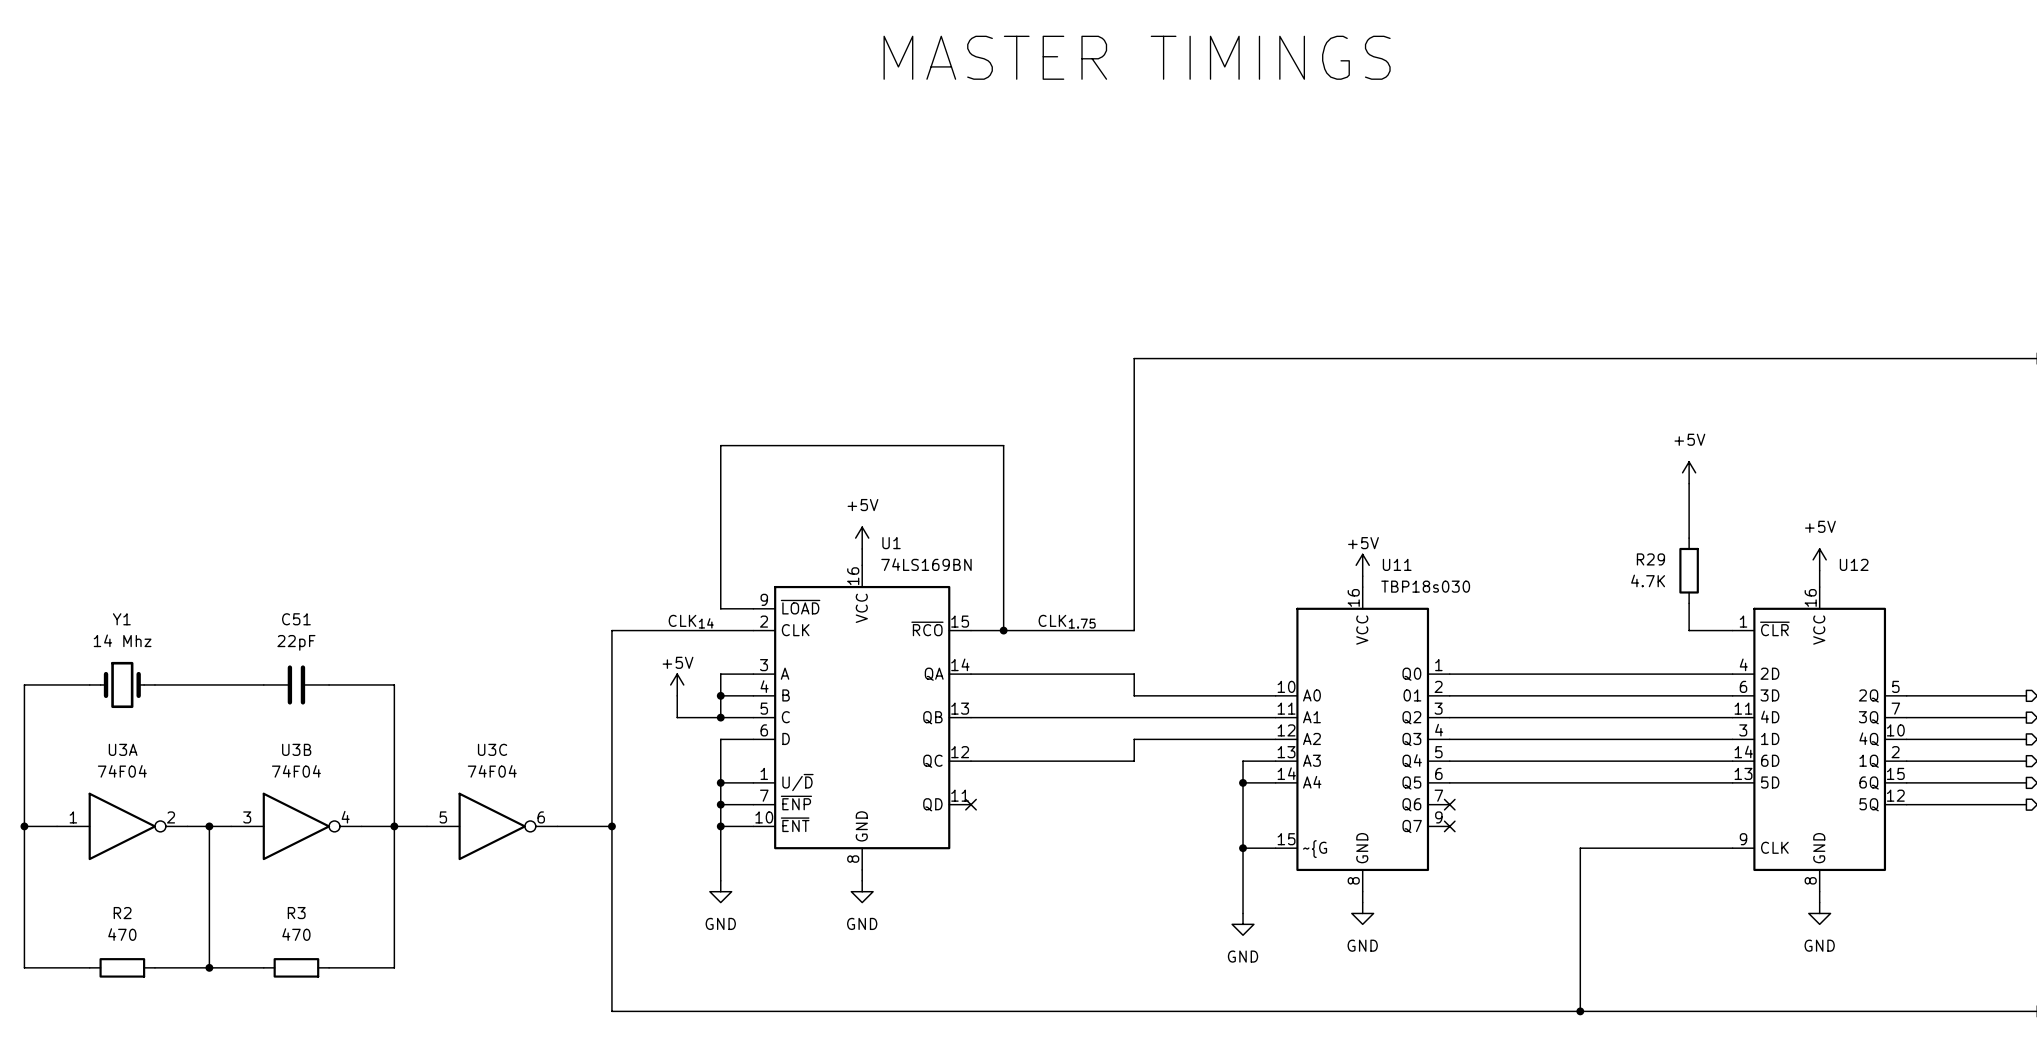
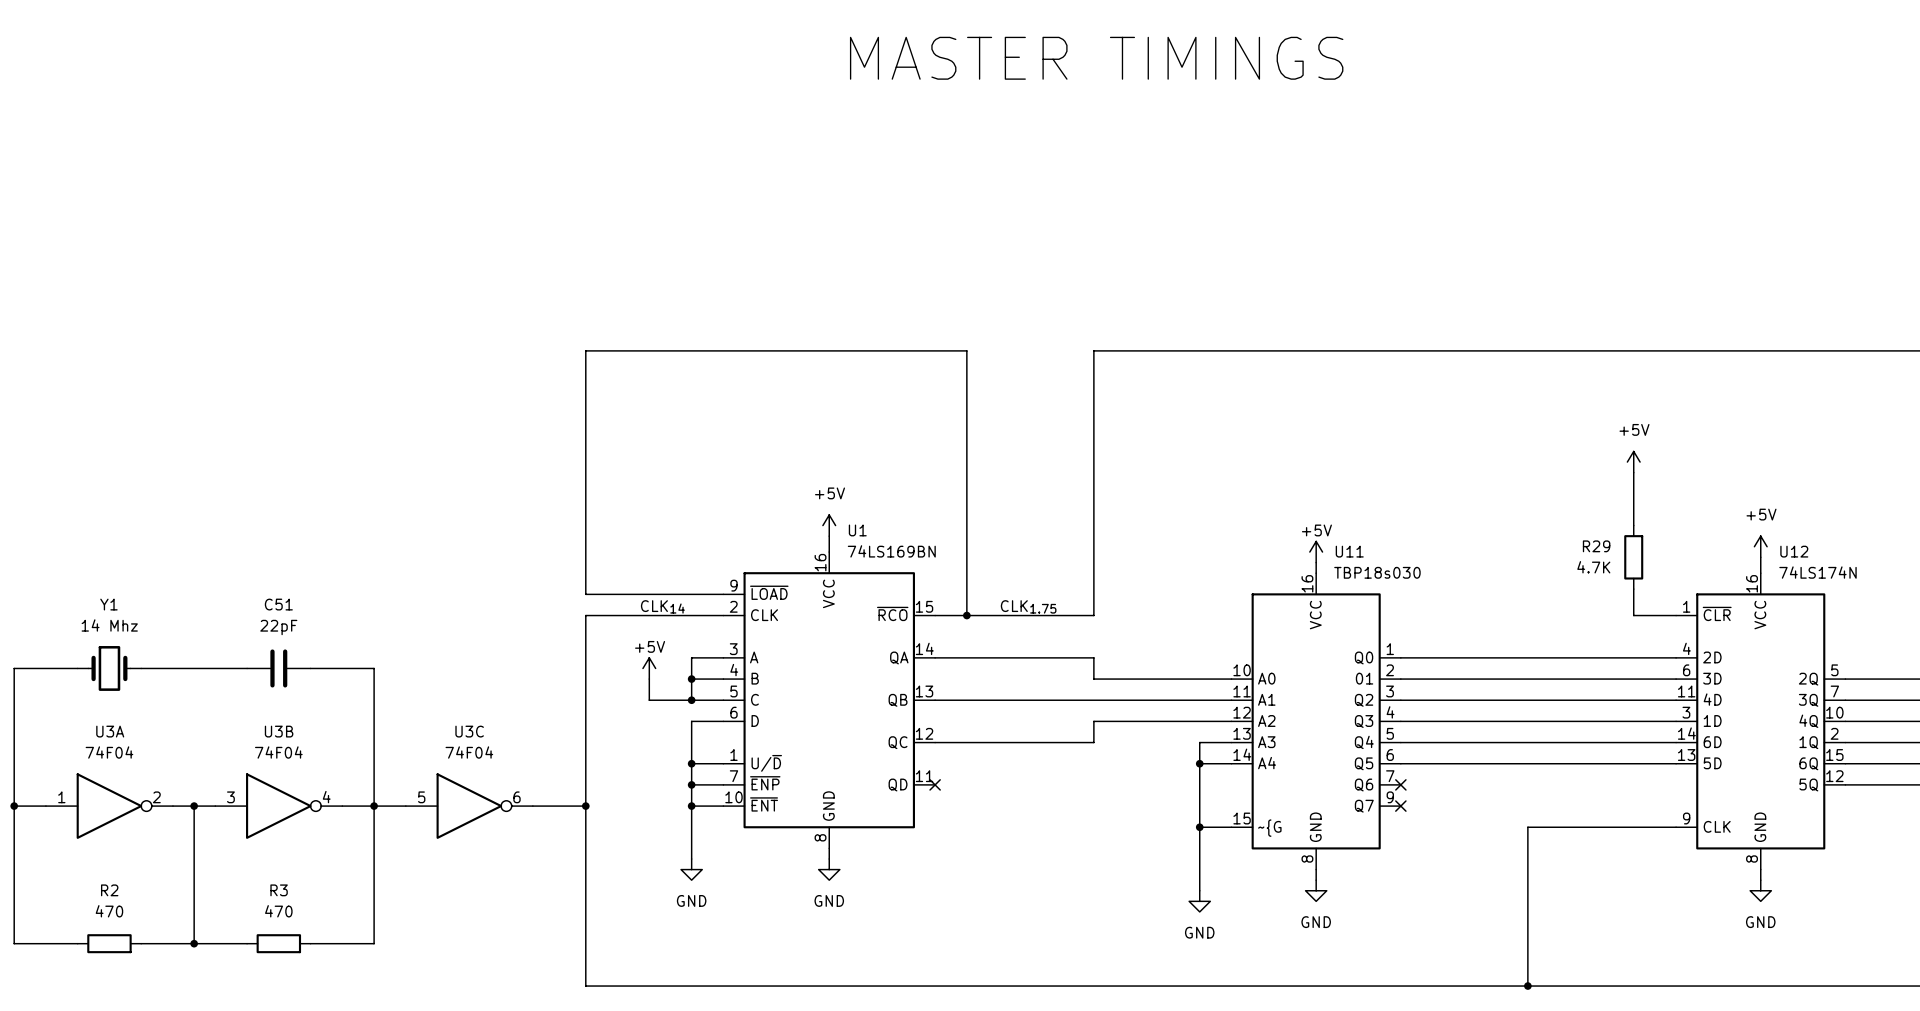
wire: (1003, 445) (720, 445) (720, 608) -> (966, 435) (966, 350) (585, 350) (585, 594) (691, 594)
U12 value: none -> 74LS174N (1817, 572)

